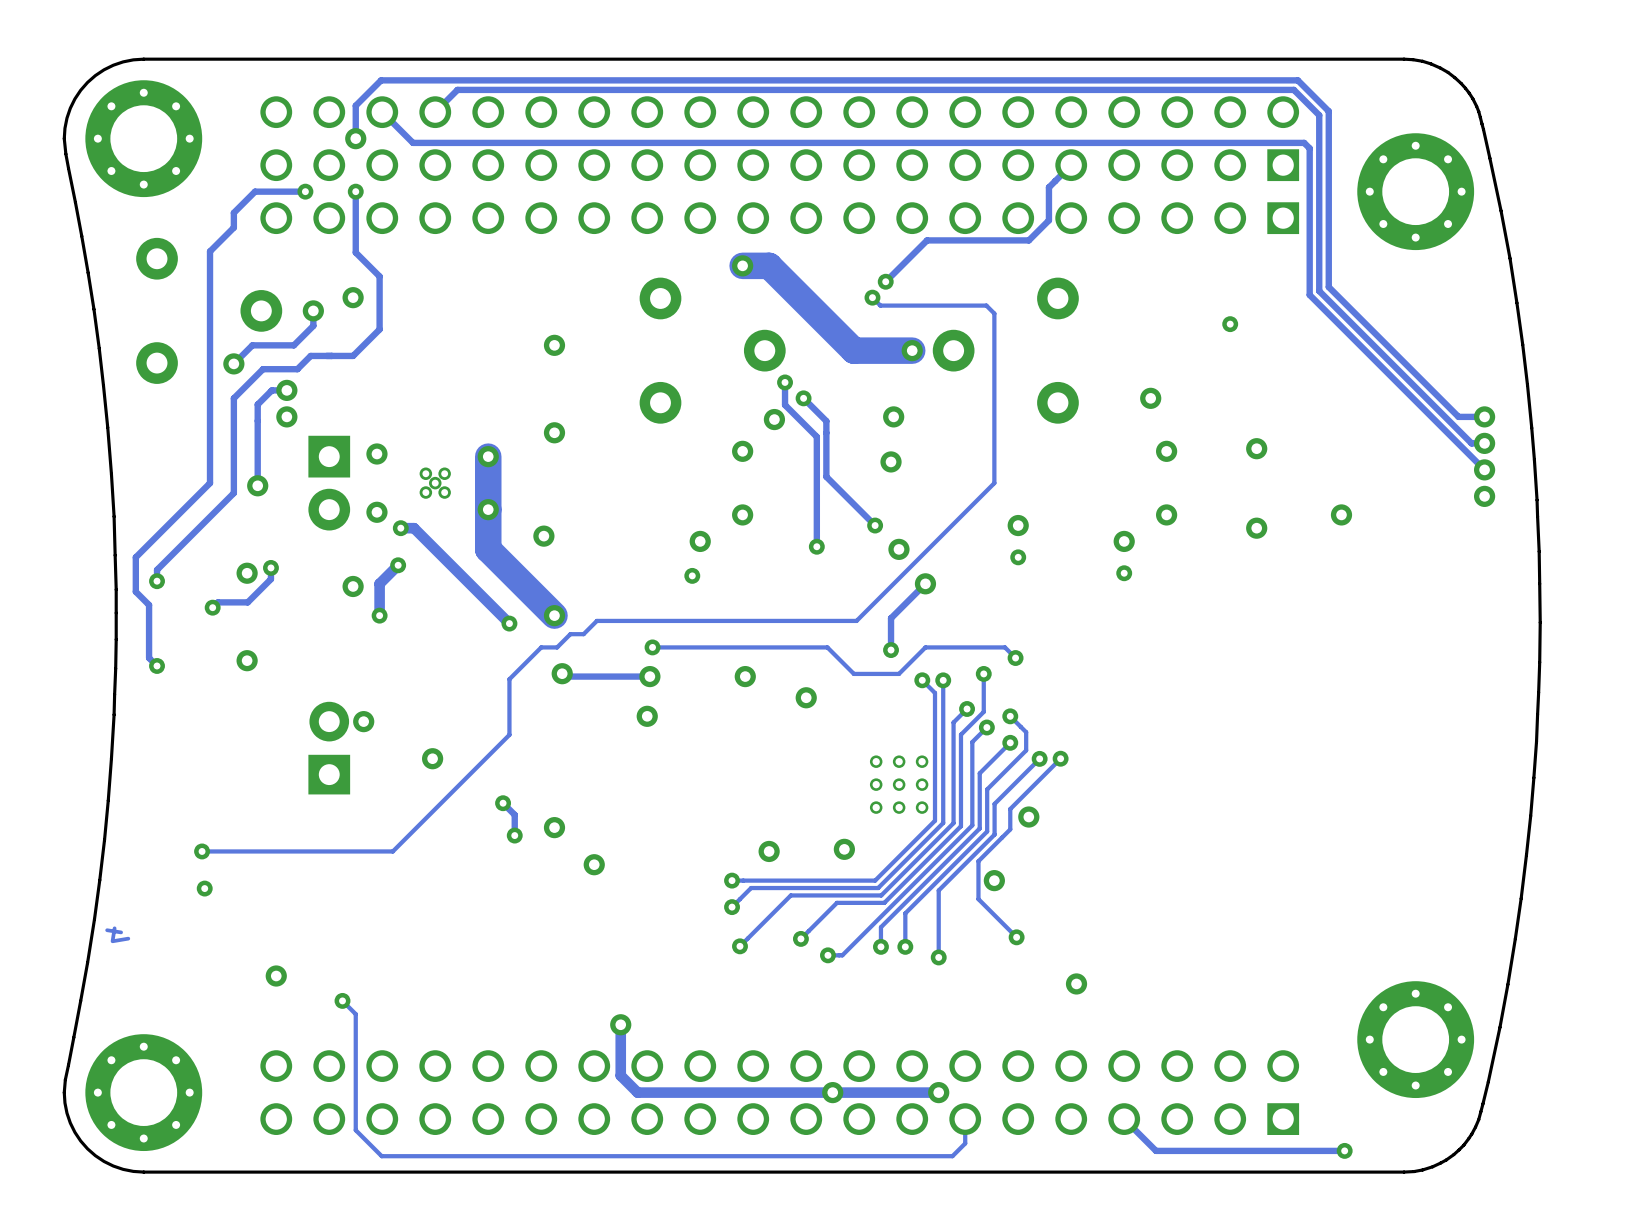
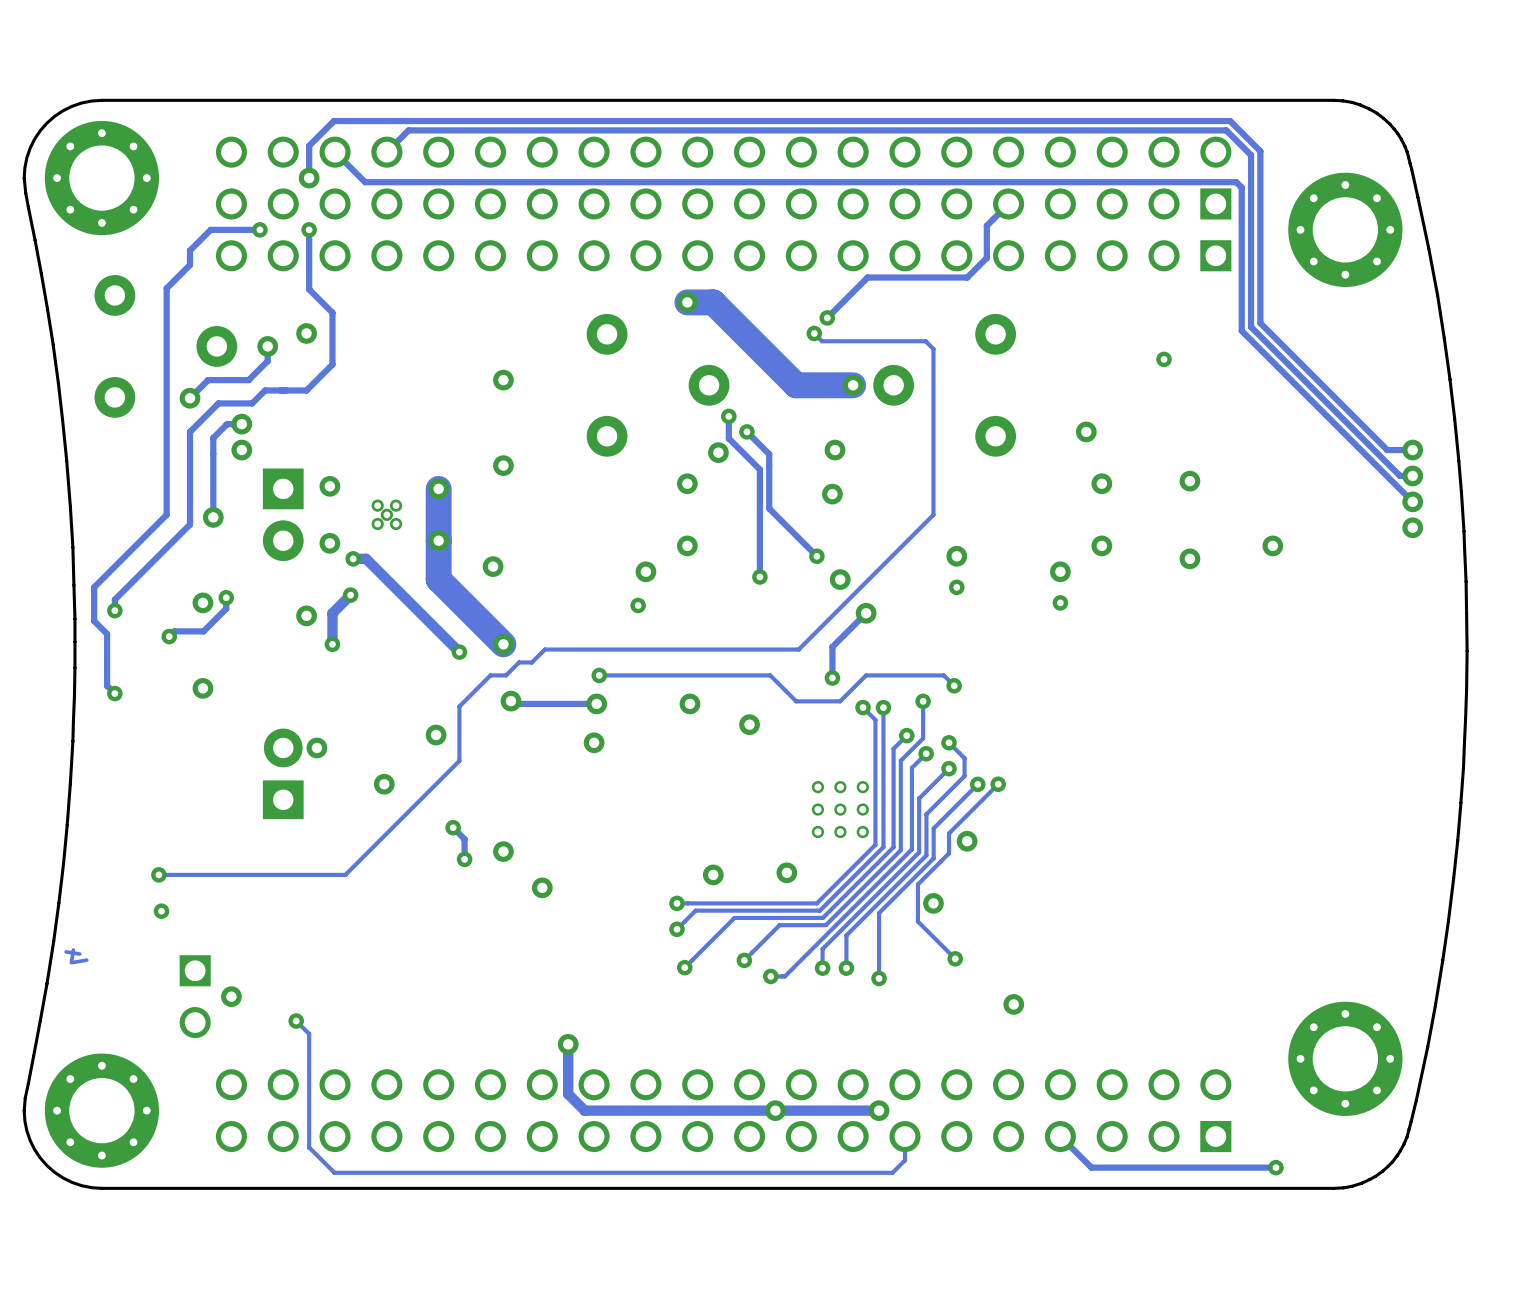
via: none -> (436, 735)
part: none -> (195, 996)

